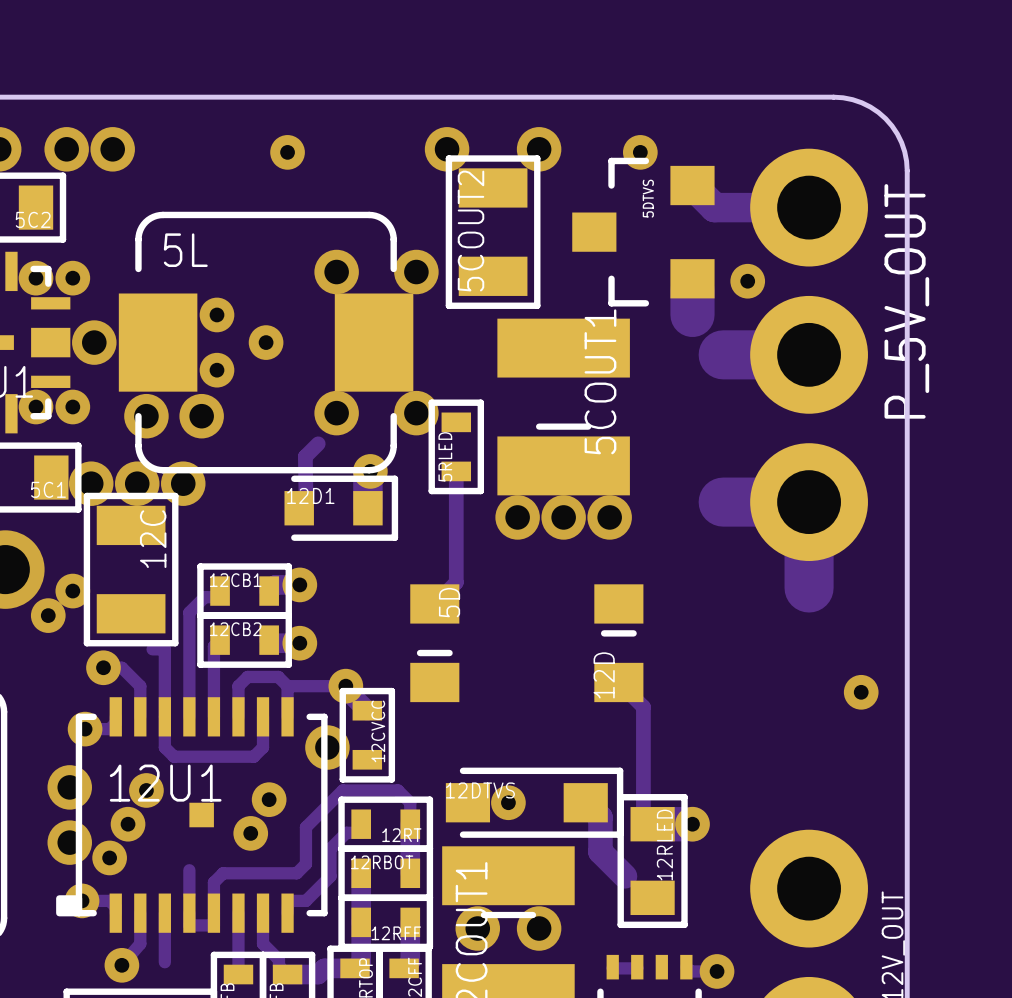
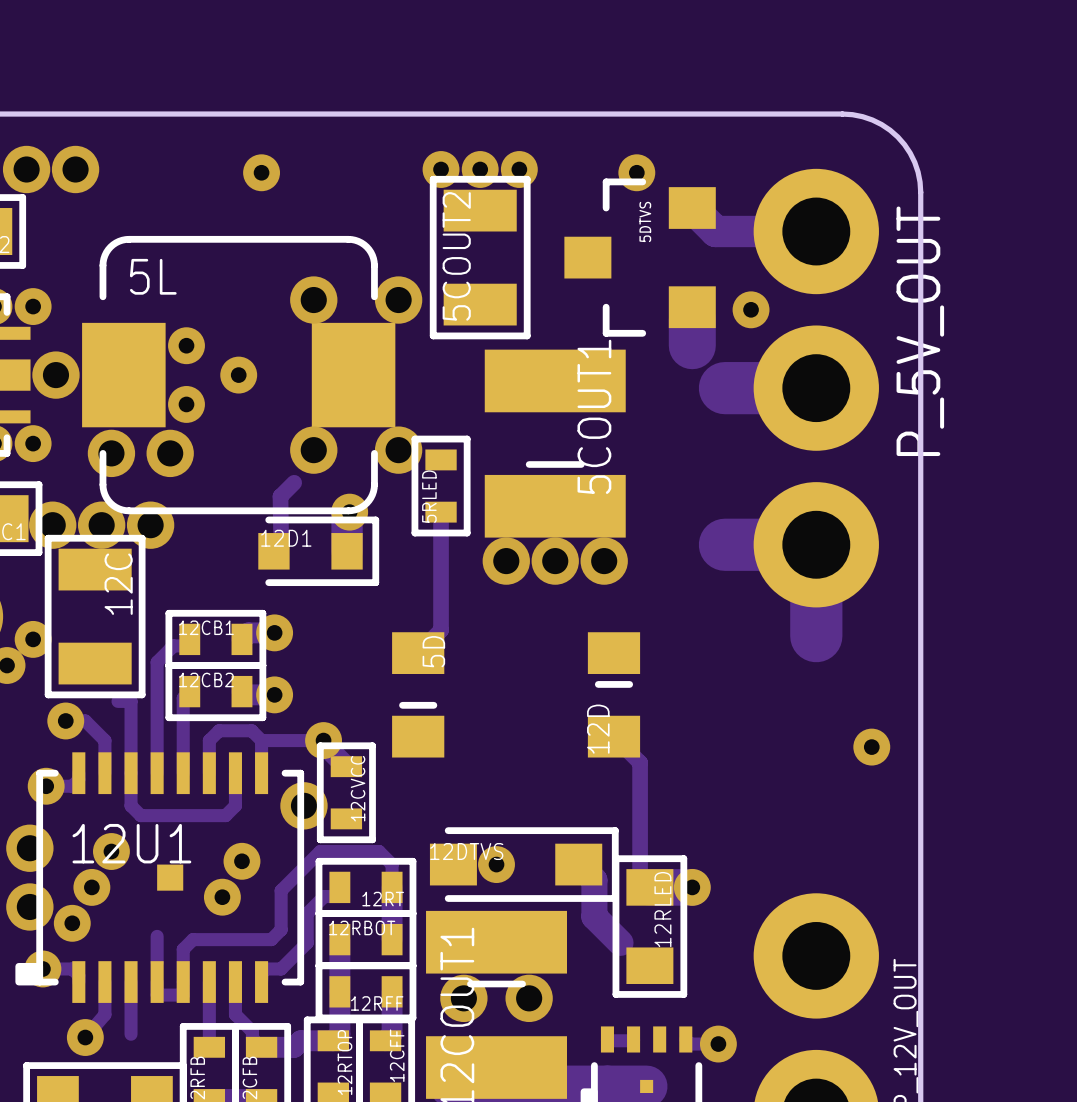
via size: [424, 127, 470, 172] -> [422, 151, 460, 188]
via size: [516, 127, 562, 172] -> [500, 151, 538, 188]
via: none -> (480, 169)

